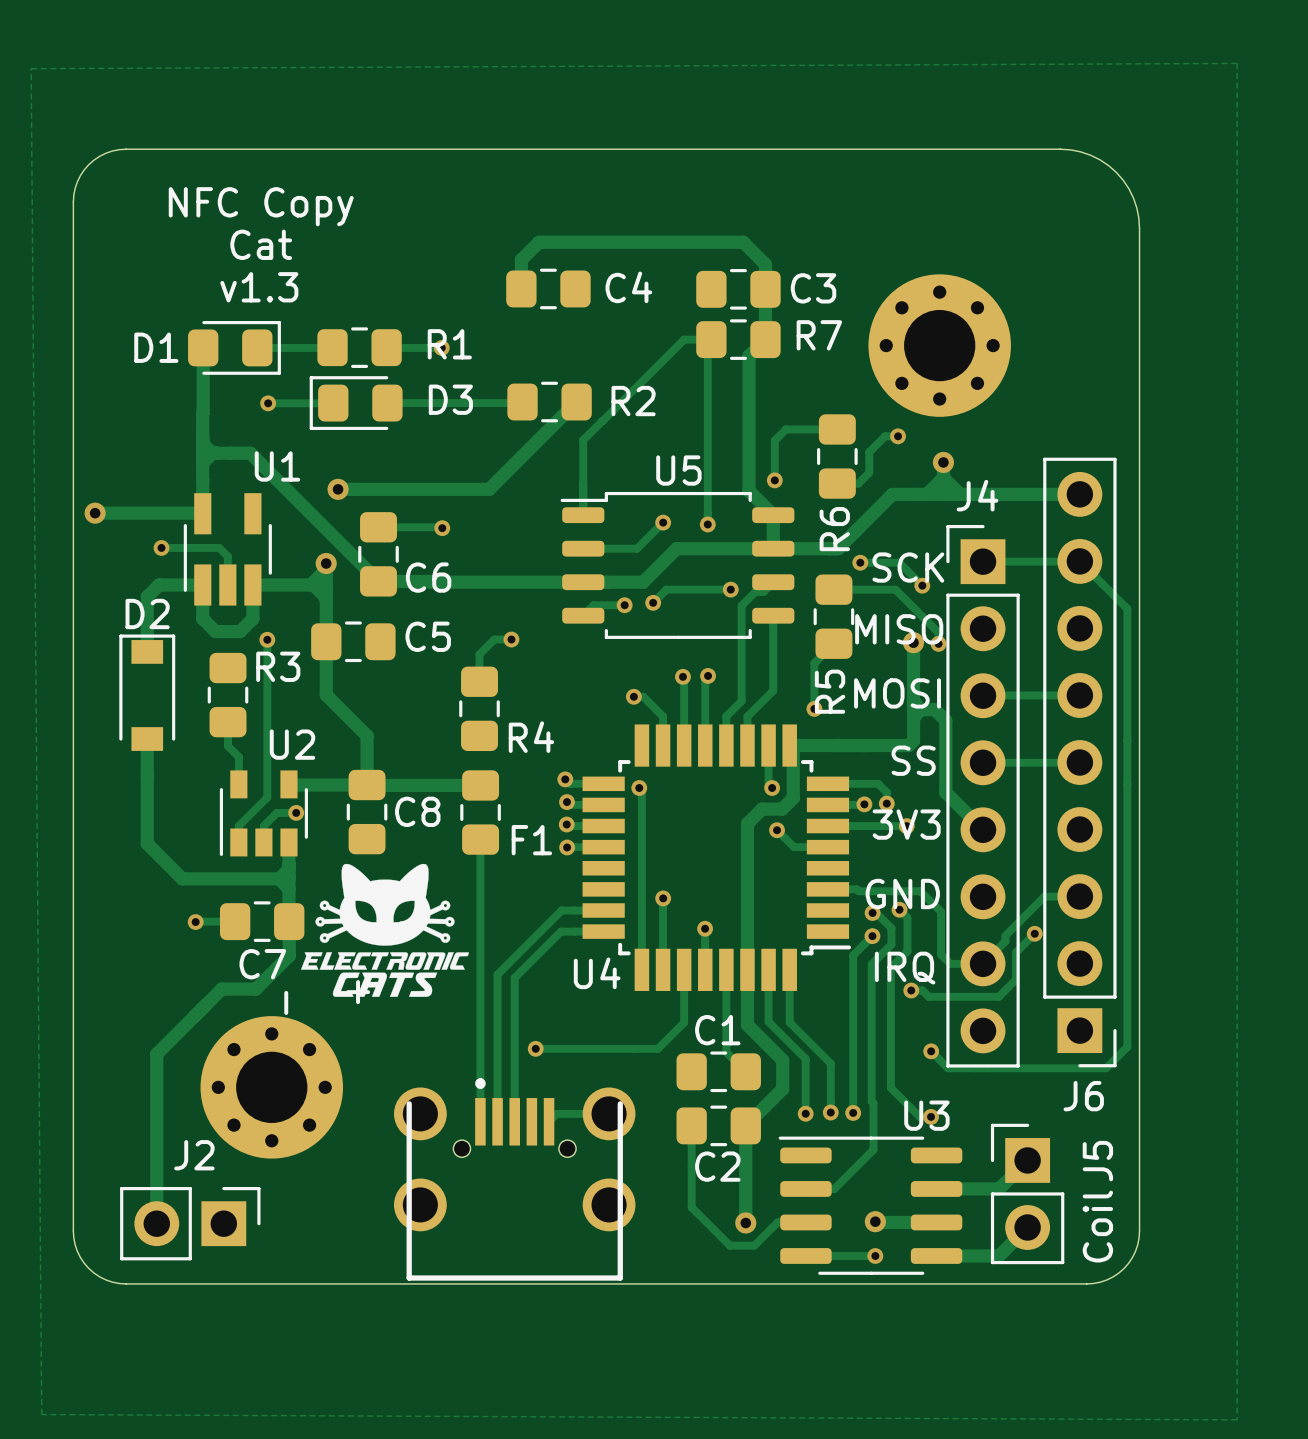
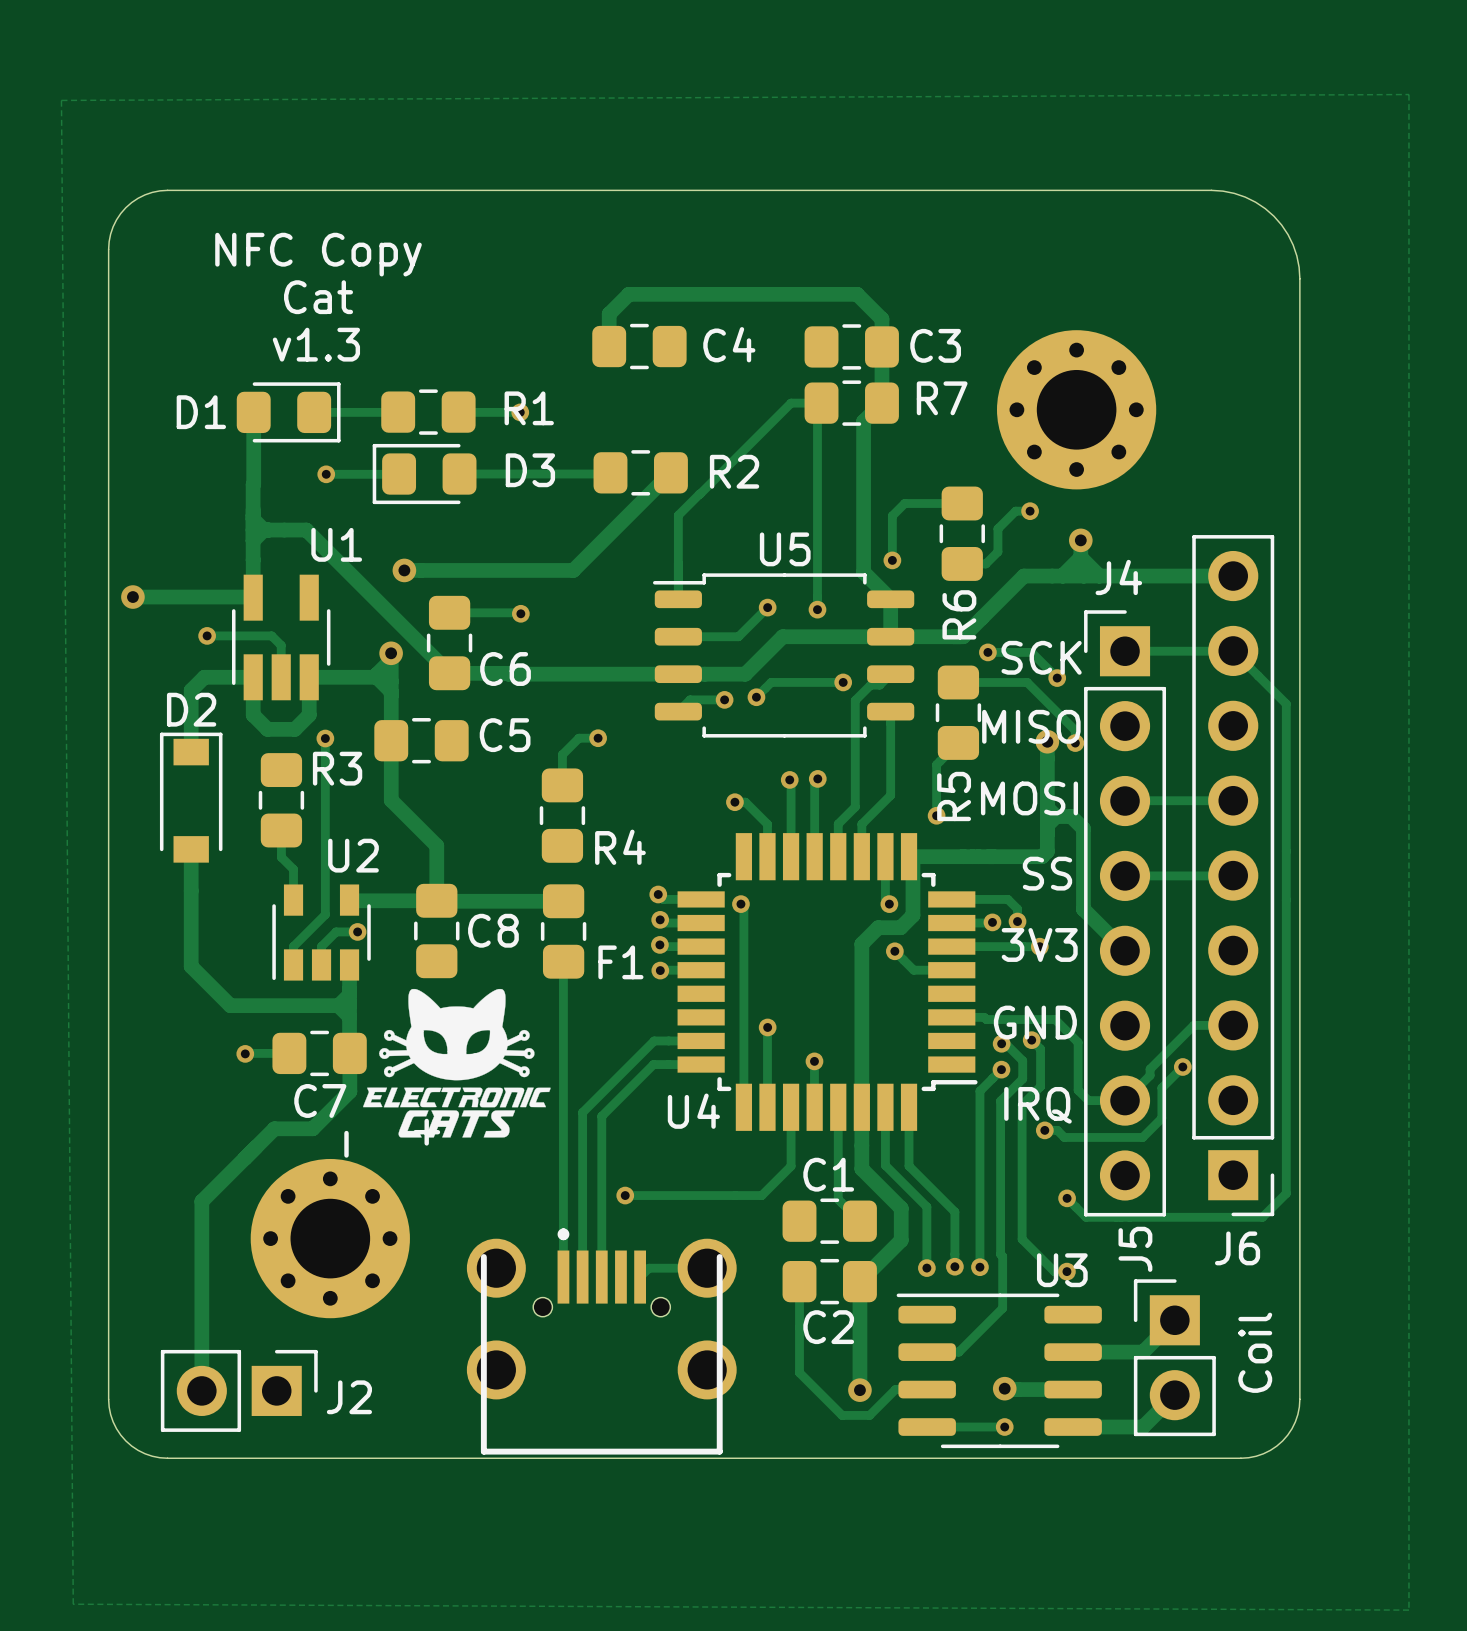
J2 name position: J2 (194, 1155) -> J2 (349, 1397)
J5 name position: J5 (1097, 1161) -> J5 (1135, 1249)
text position: Coil (1097, 1226) -> Coil (1255, 1352)

